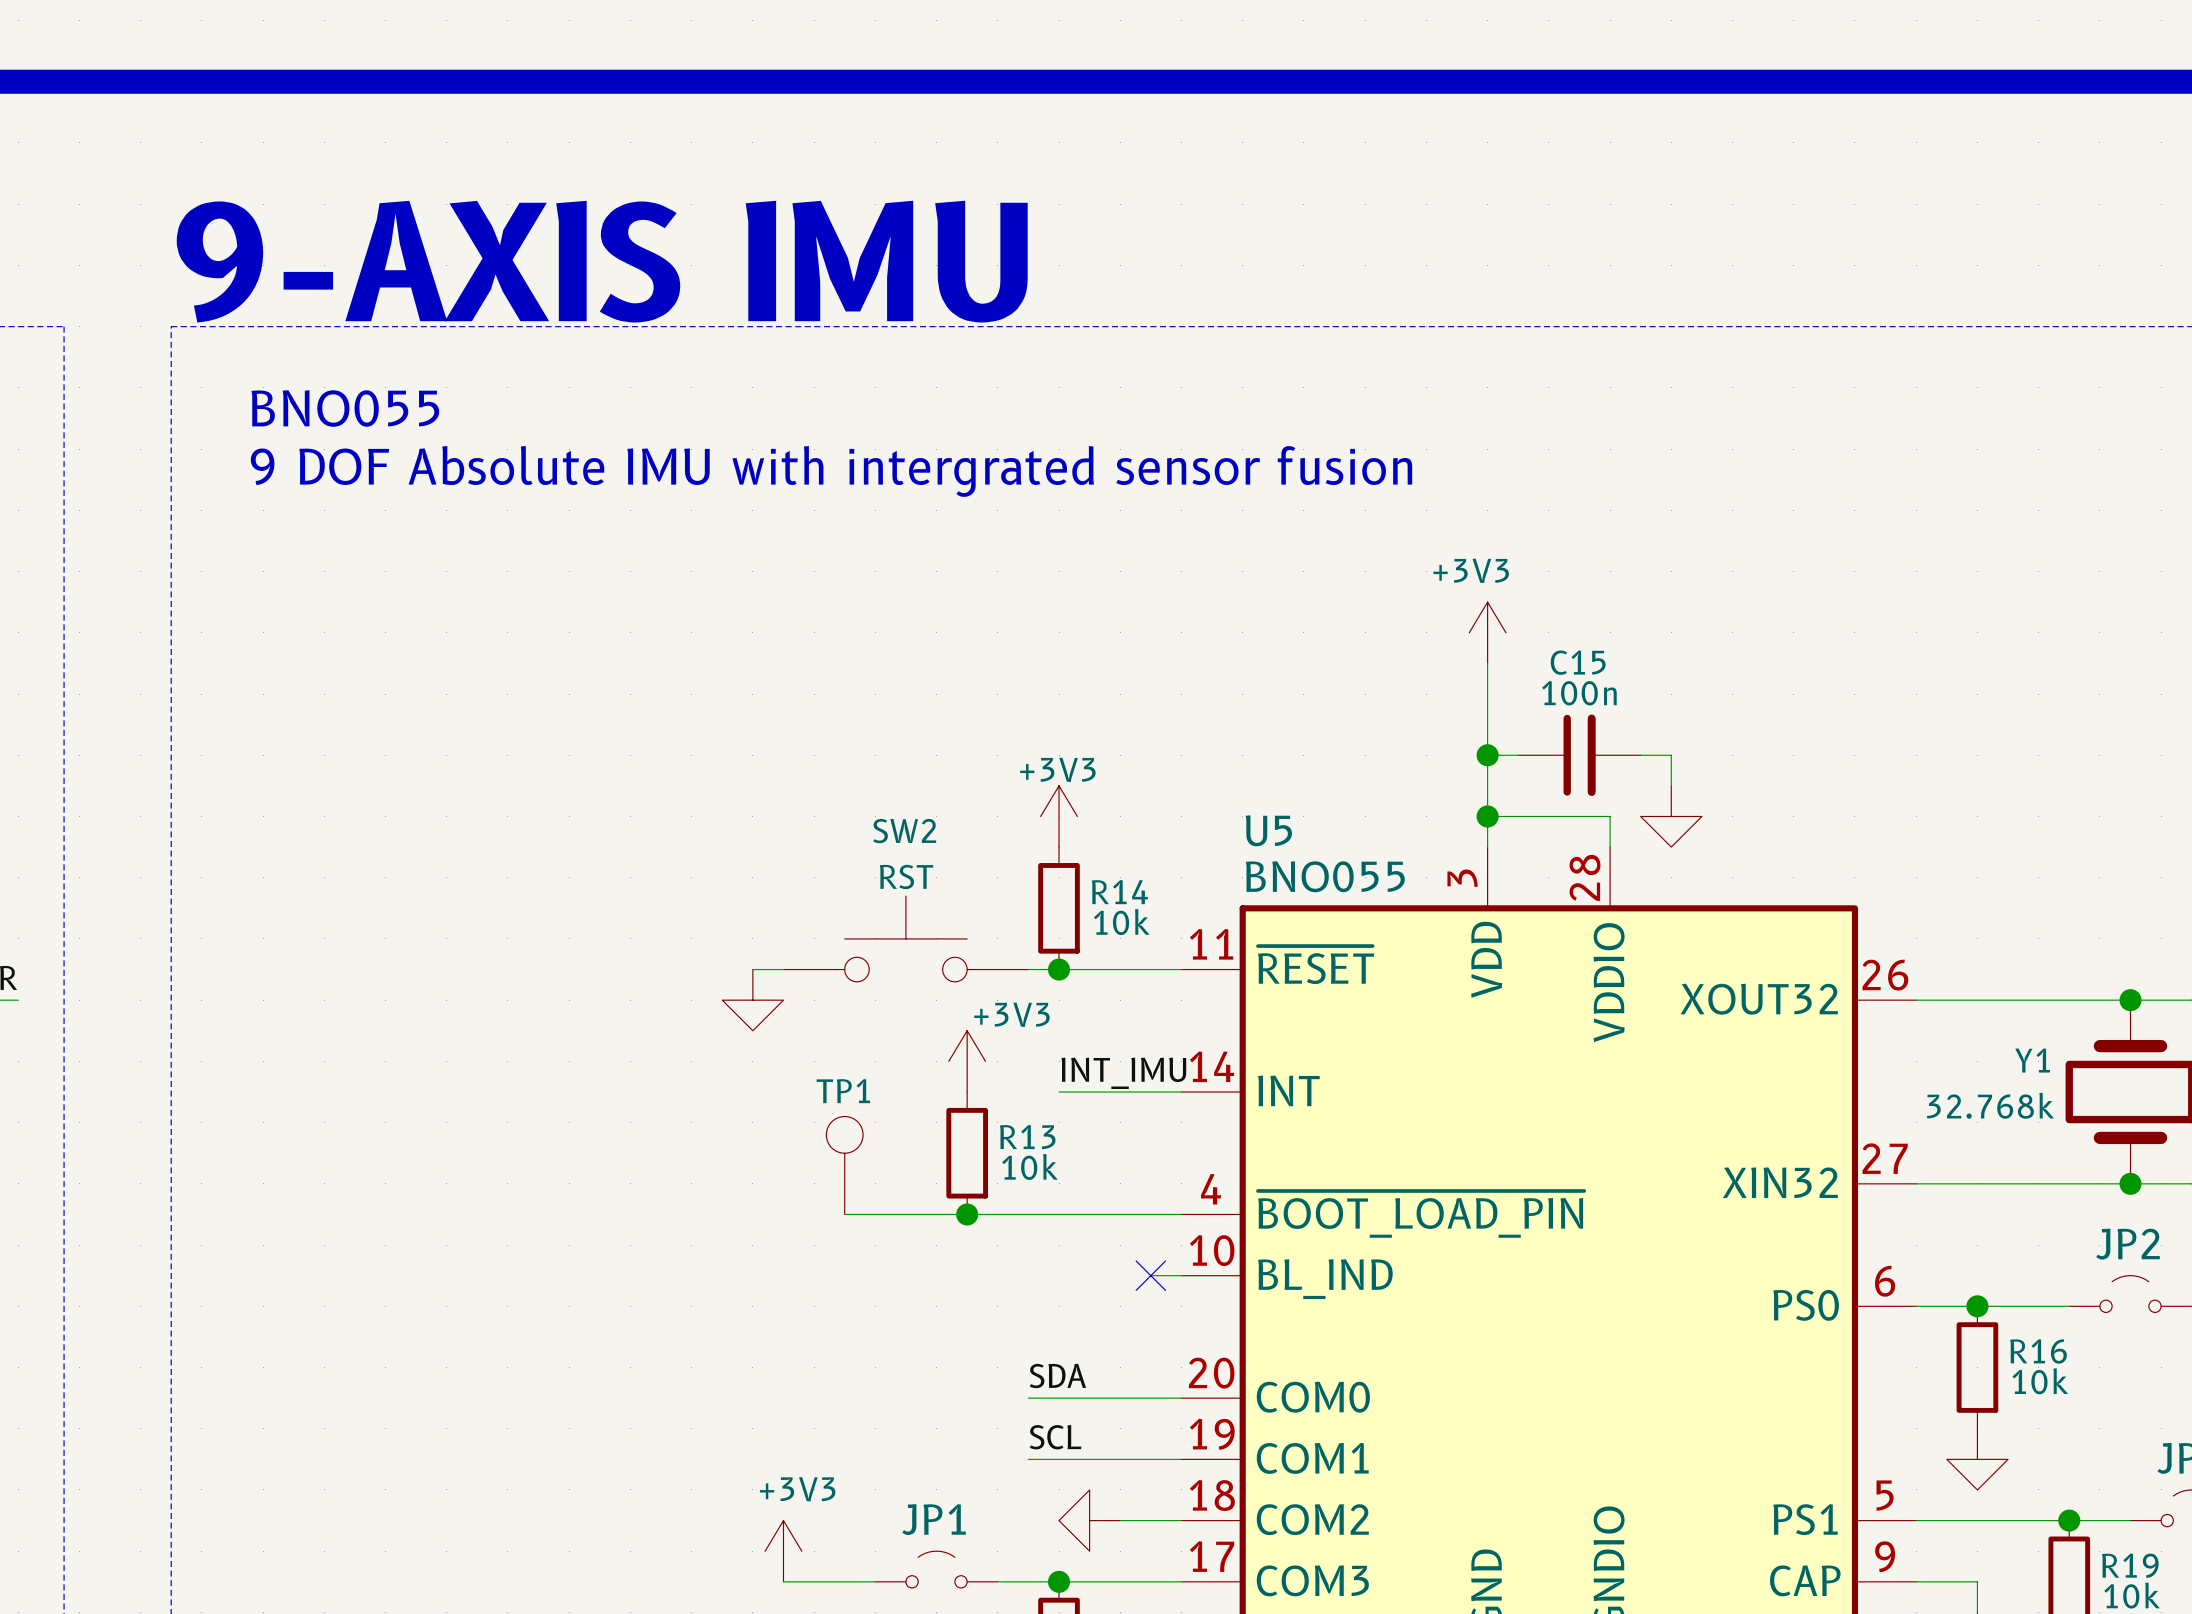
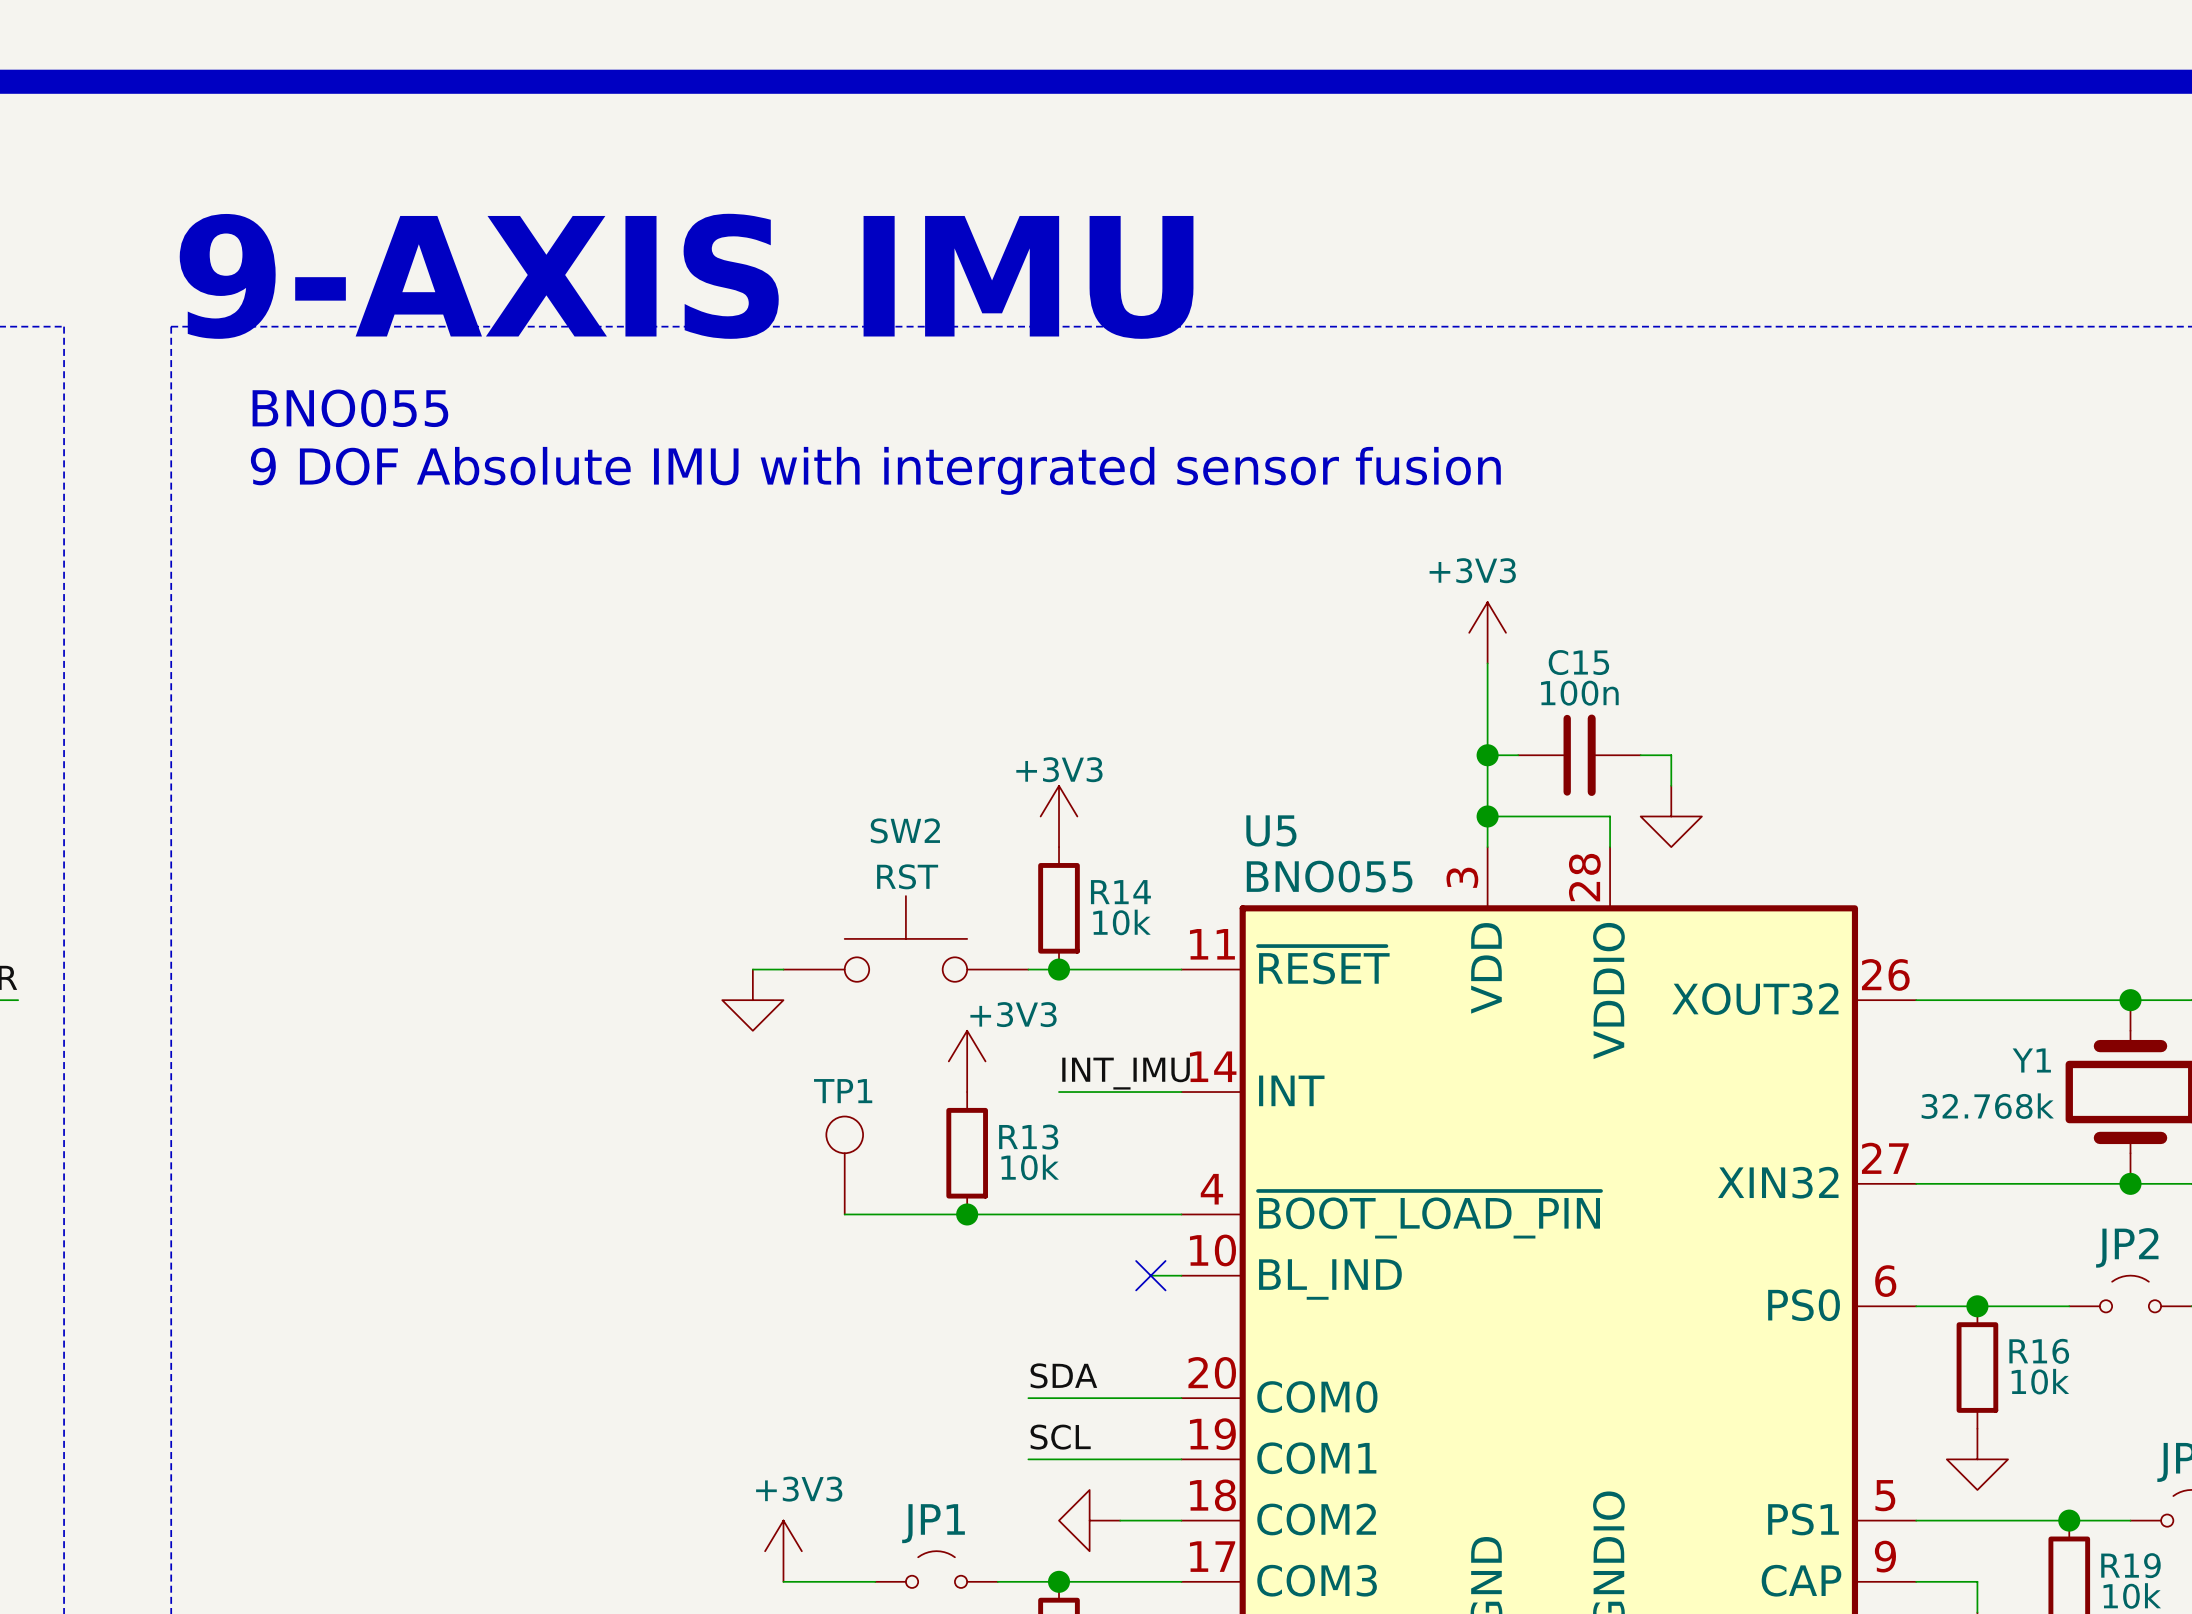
text position: 9-AXIS IMU (602, 261) -> 9-AXIS IMU (686, 276)

